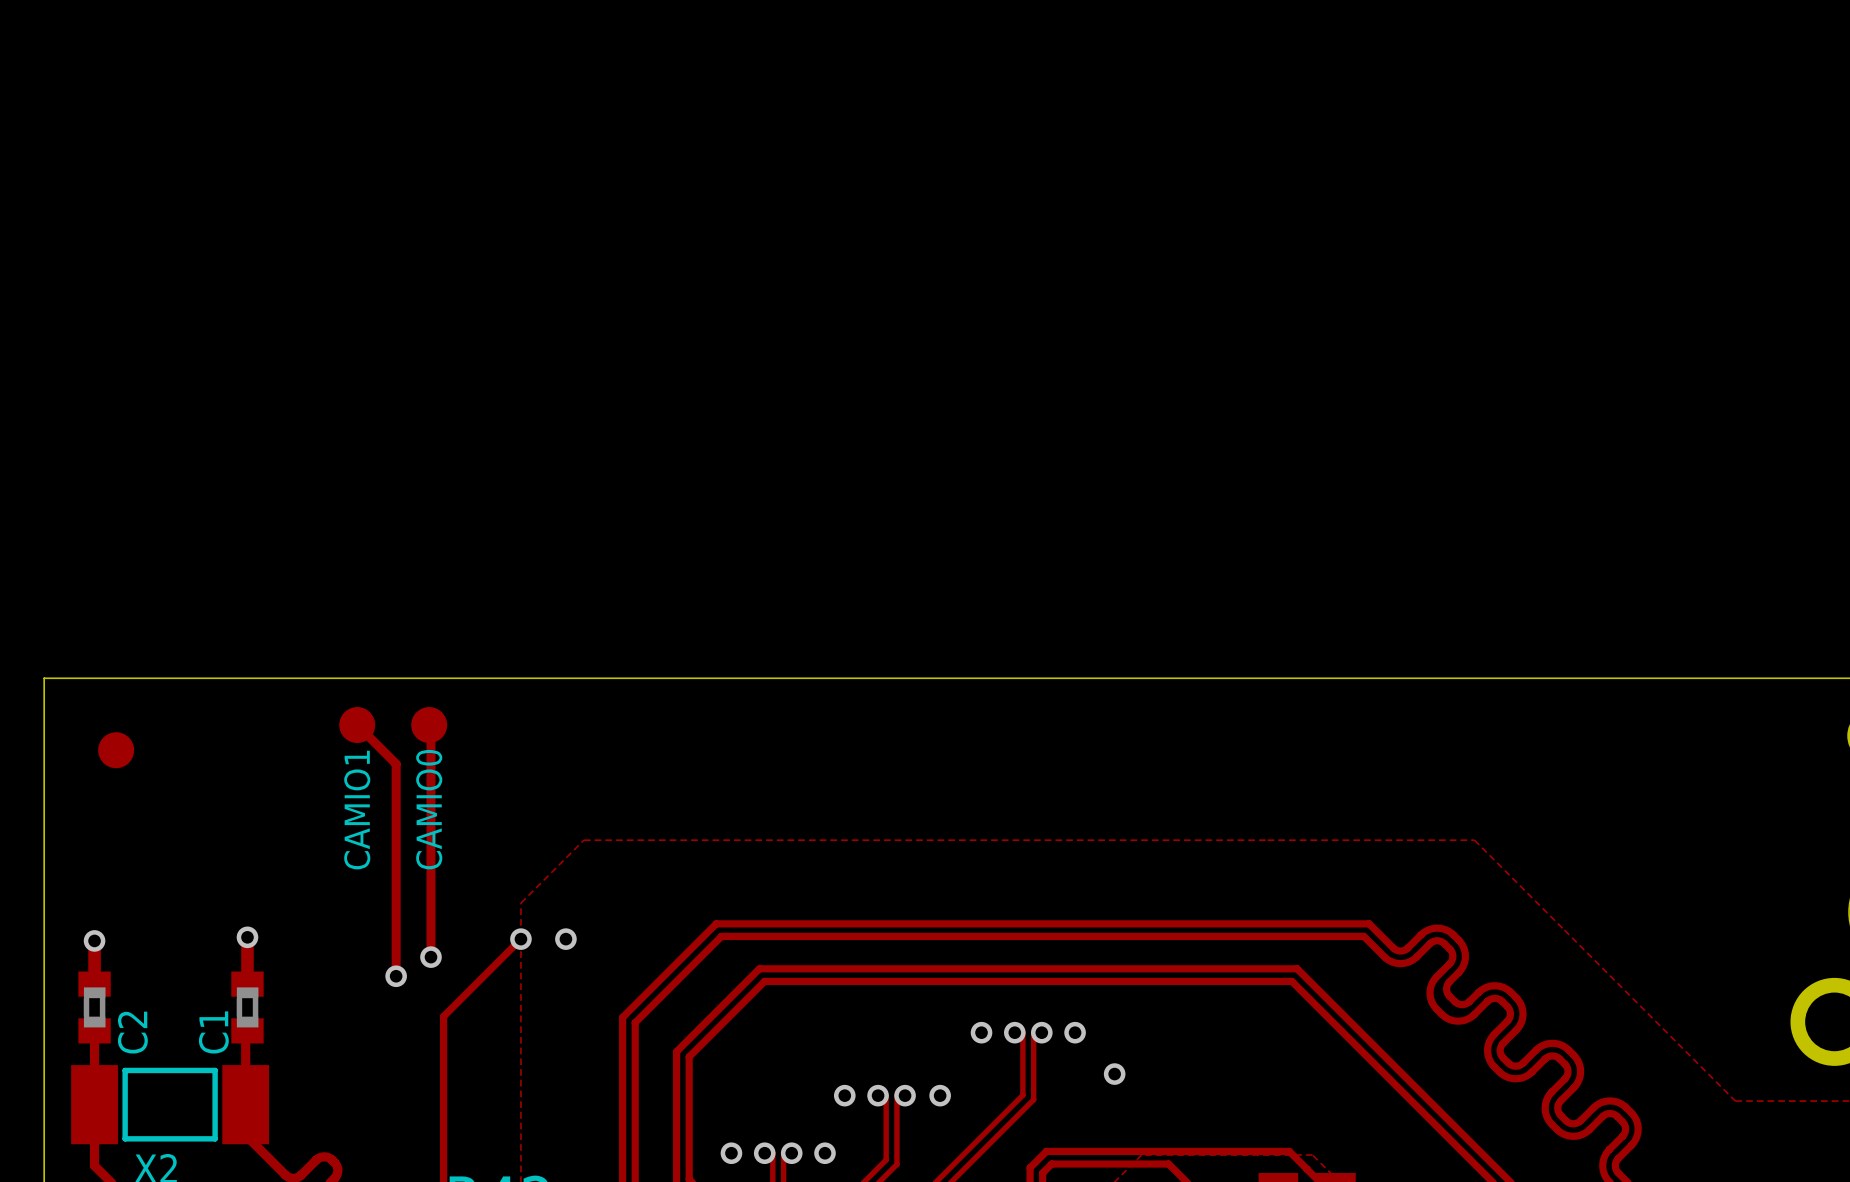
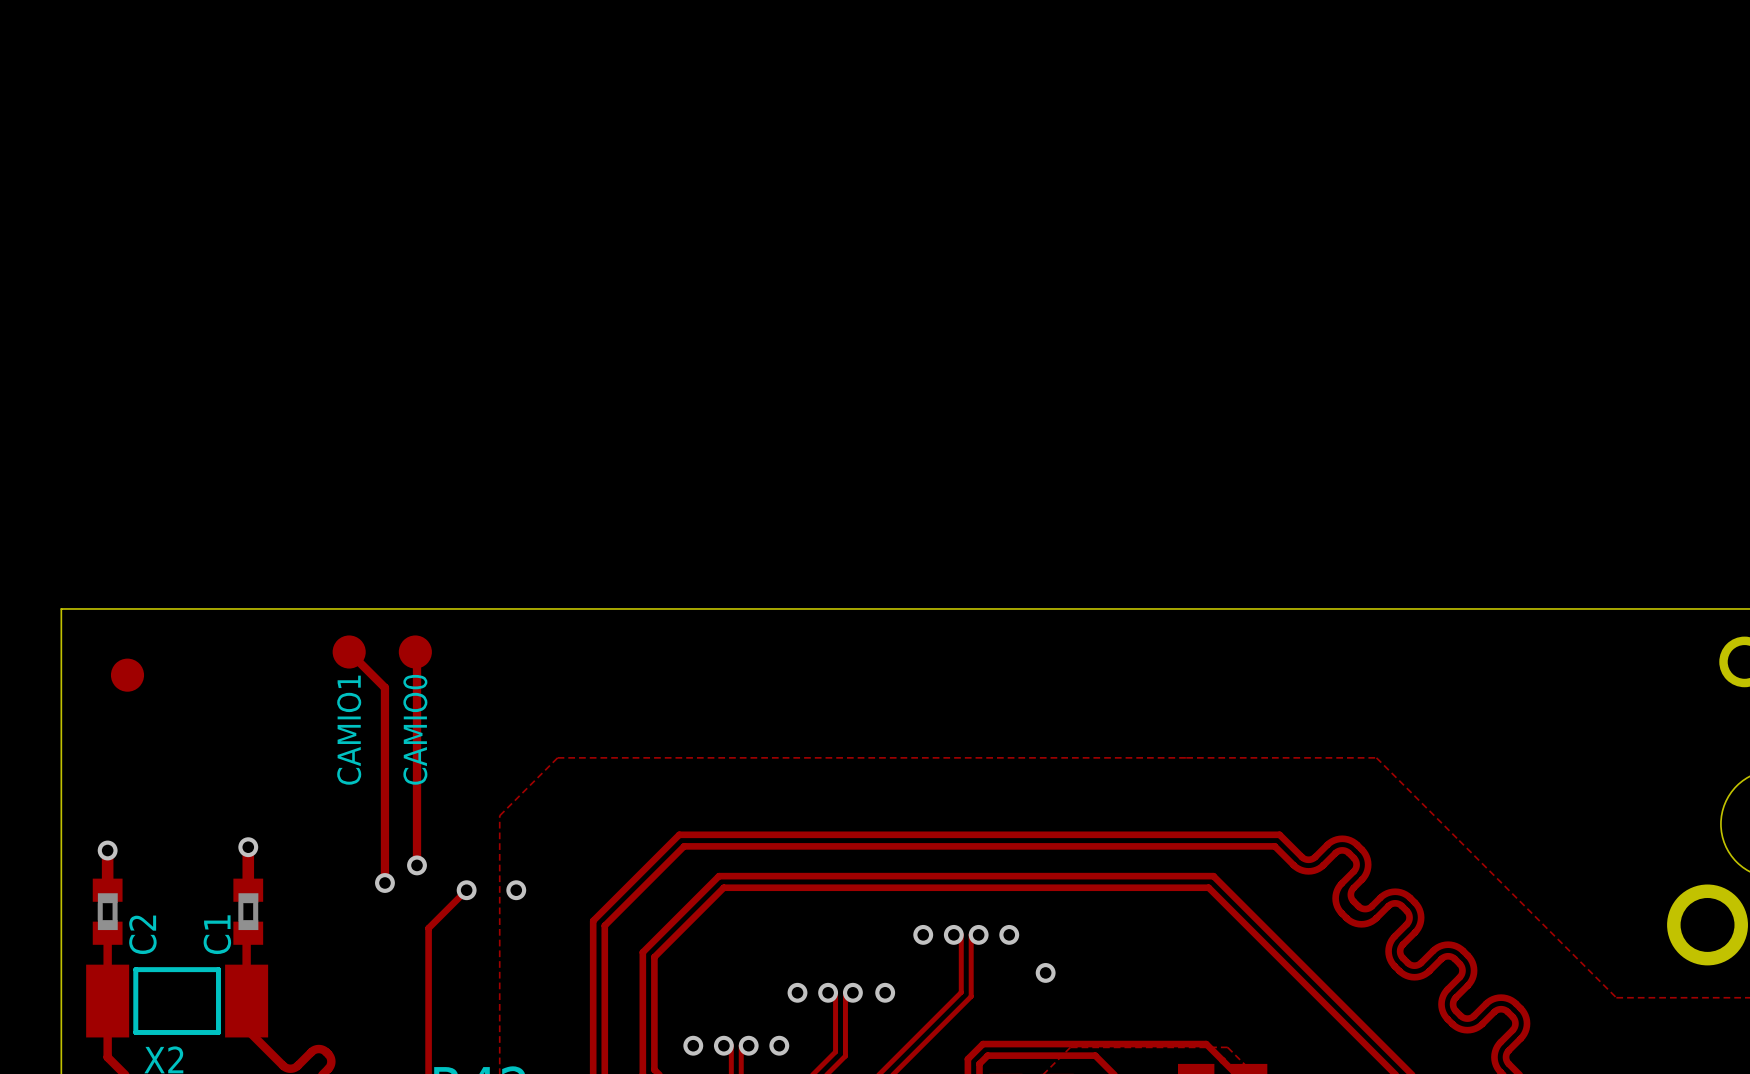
track: (520, 939) (443, 1016) (443, 1025) -> (466, 890) (428, 928)
via: (520, 939) -> none
via: (565, 939) -> none
via: none -> (466, 890)
via: none -> (516, 890)

